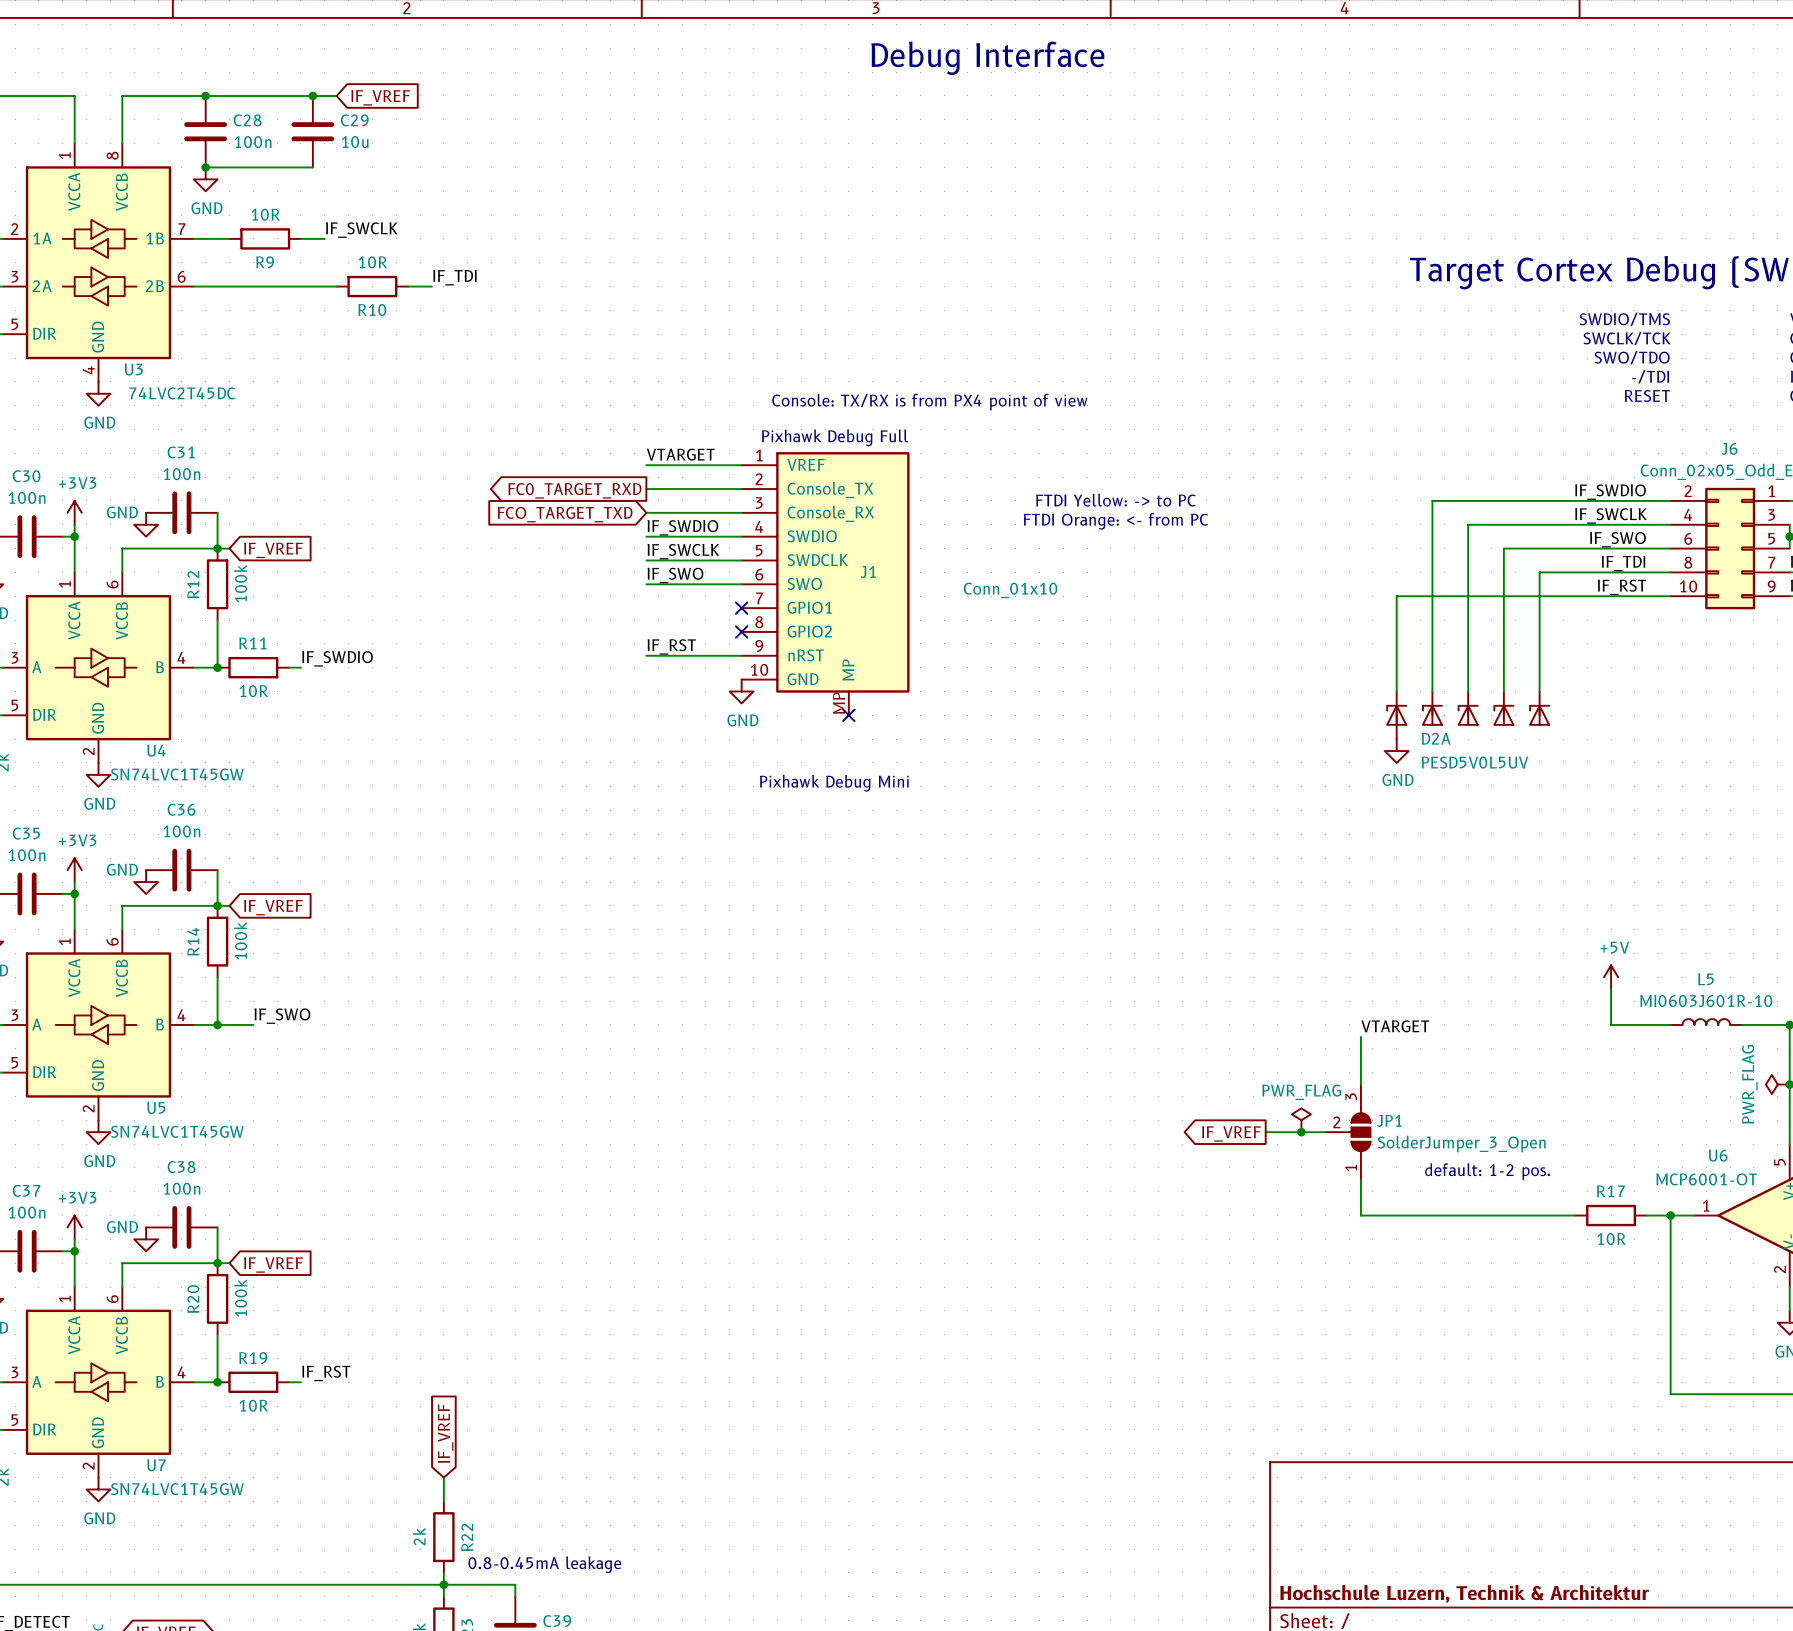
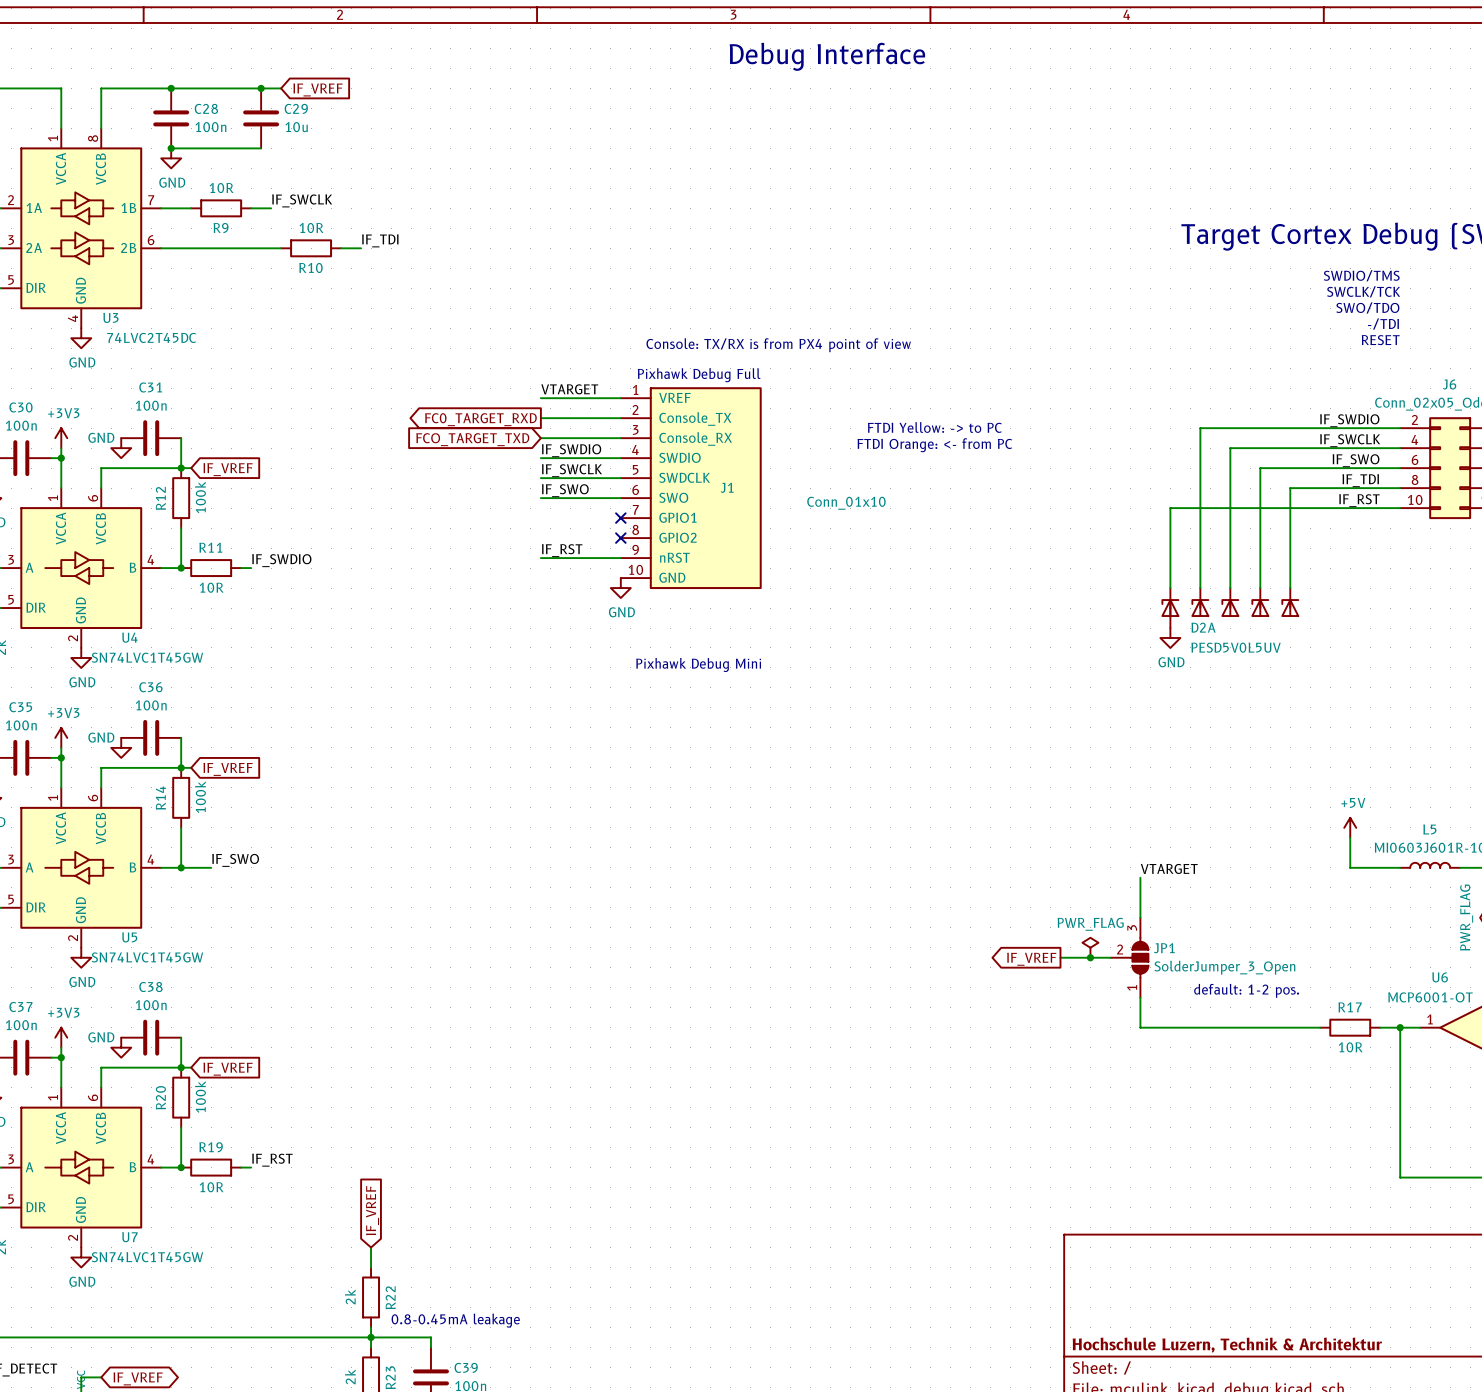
J1 symbol: [741, 452, 910, 716] -> [620, 387, 762, 590]
no-connect mark: (848, 715) -> none

